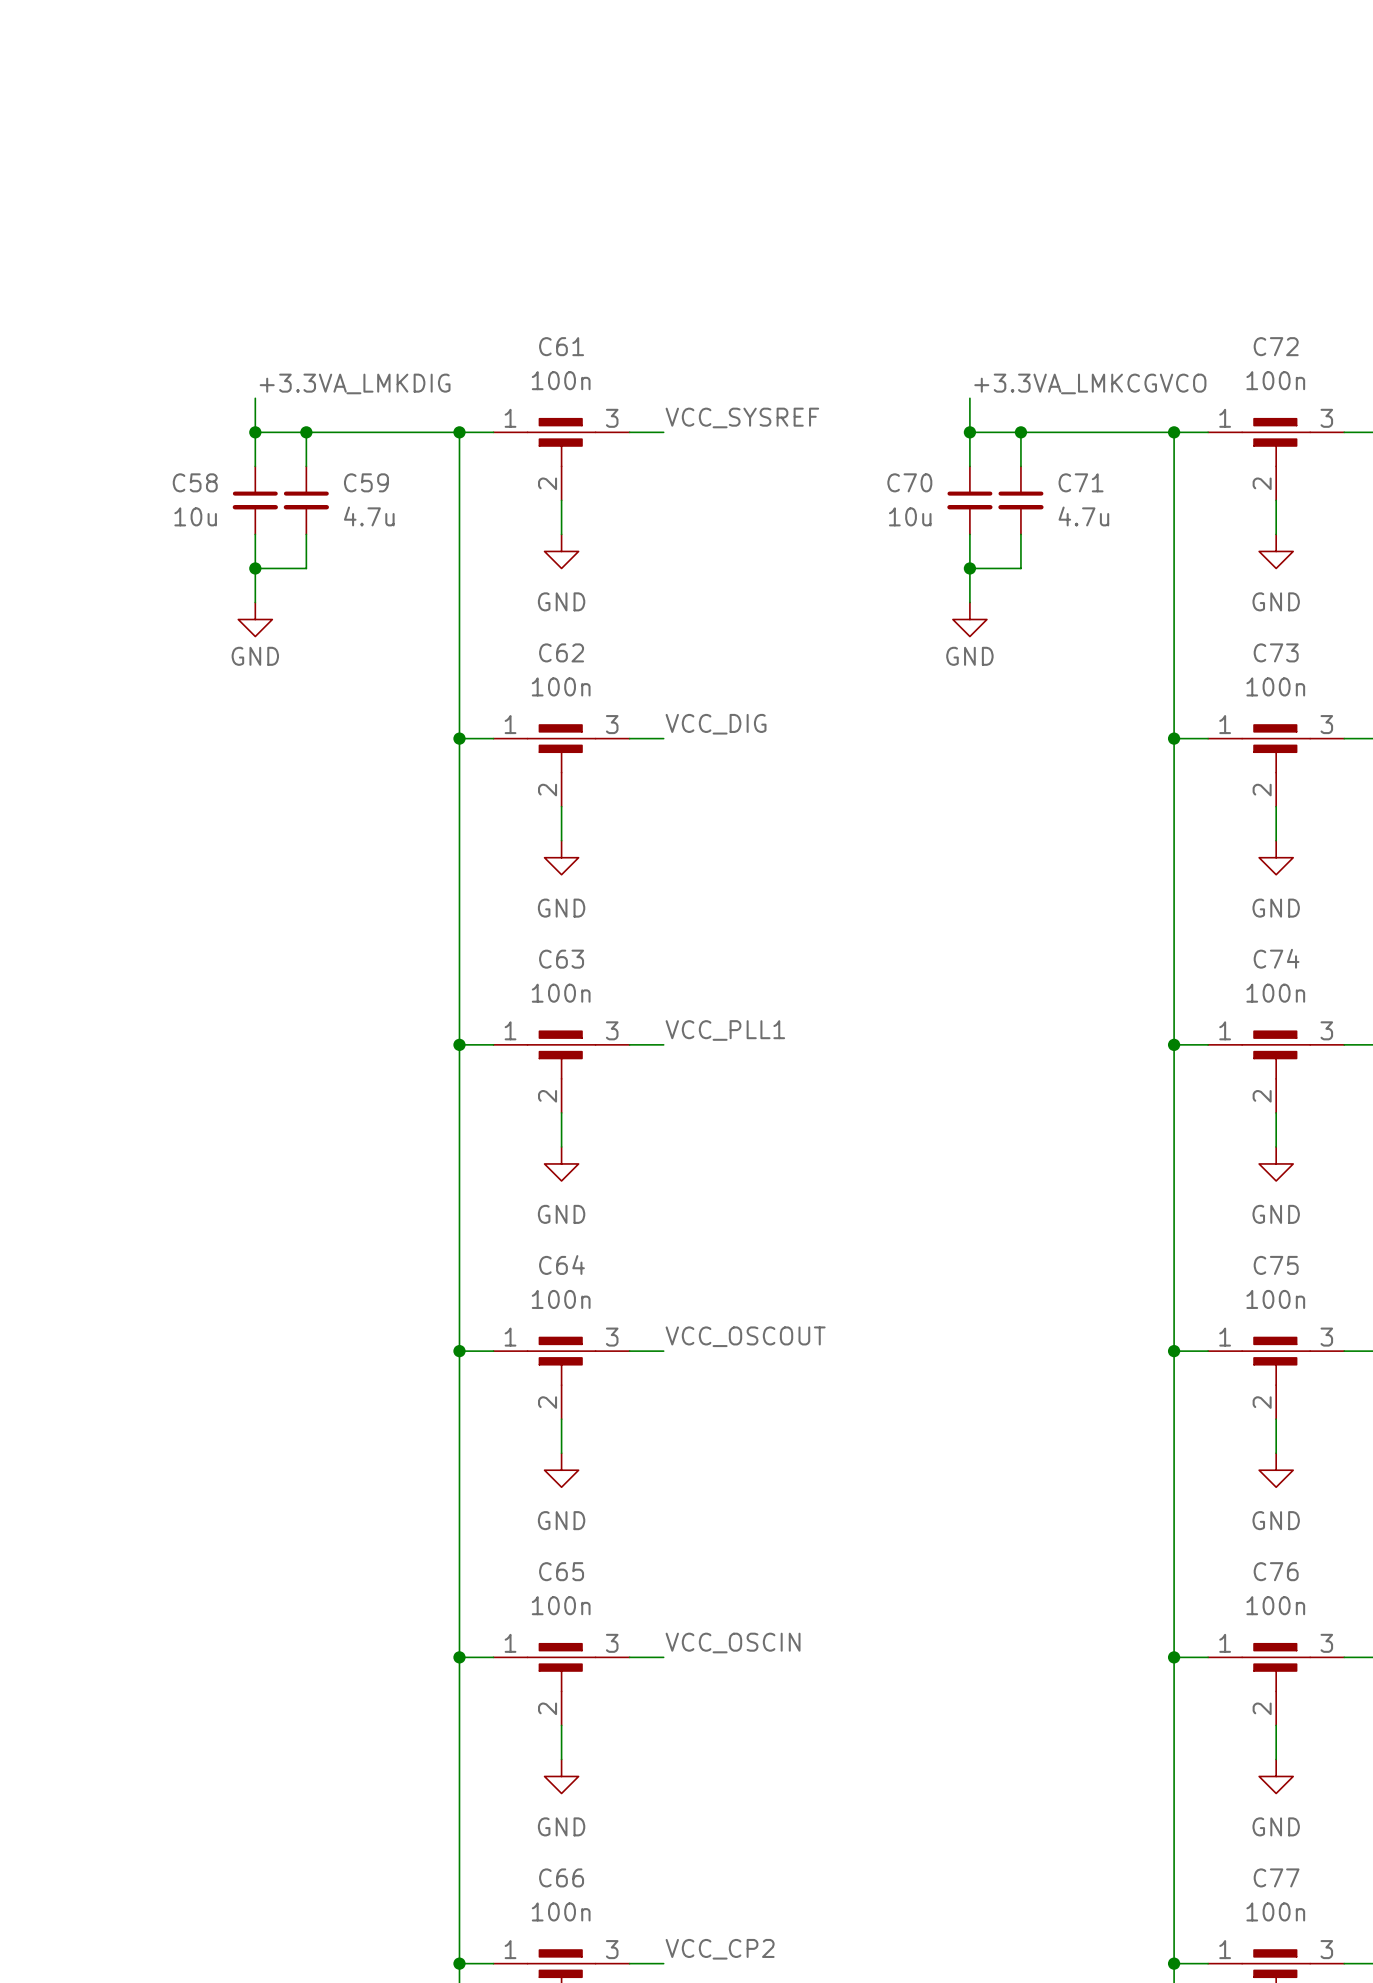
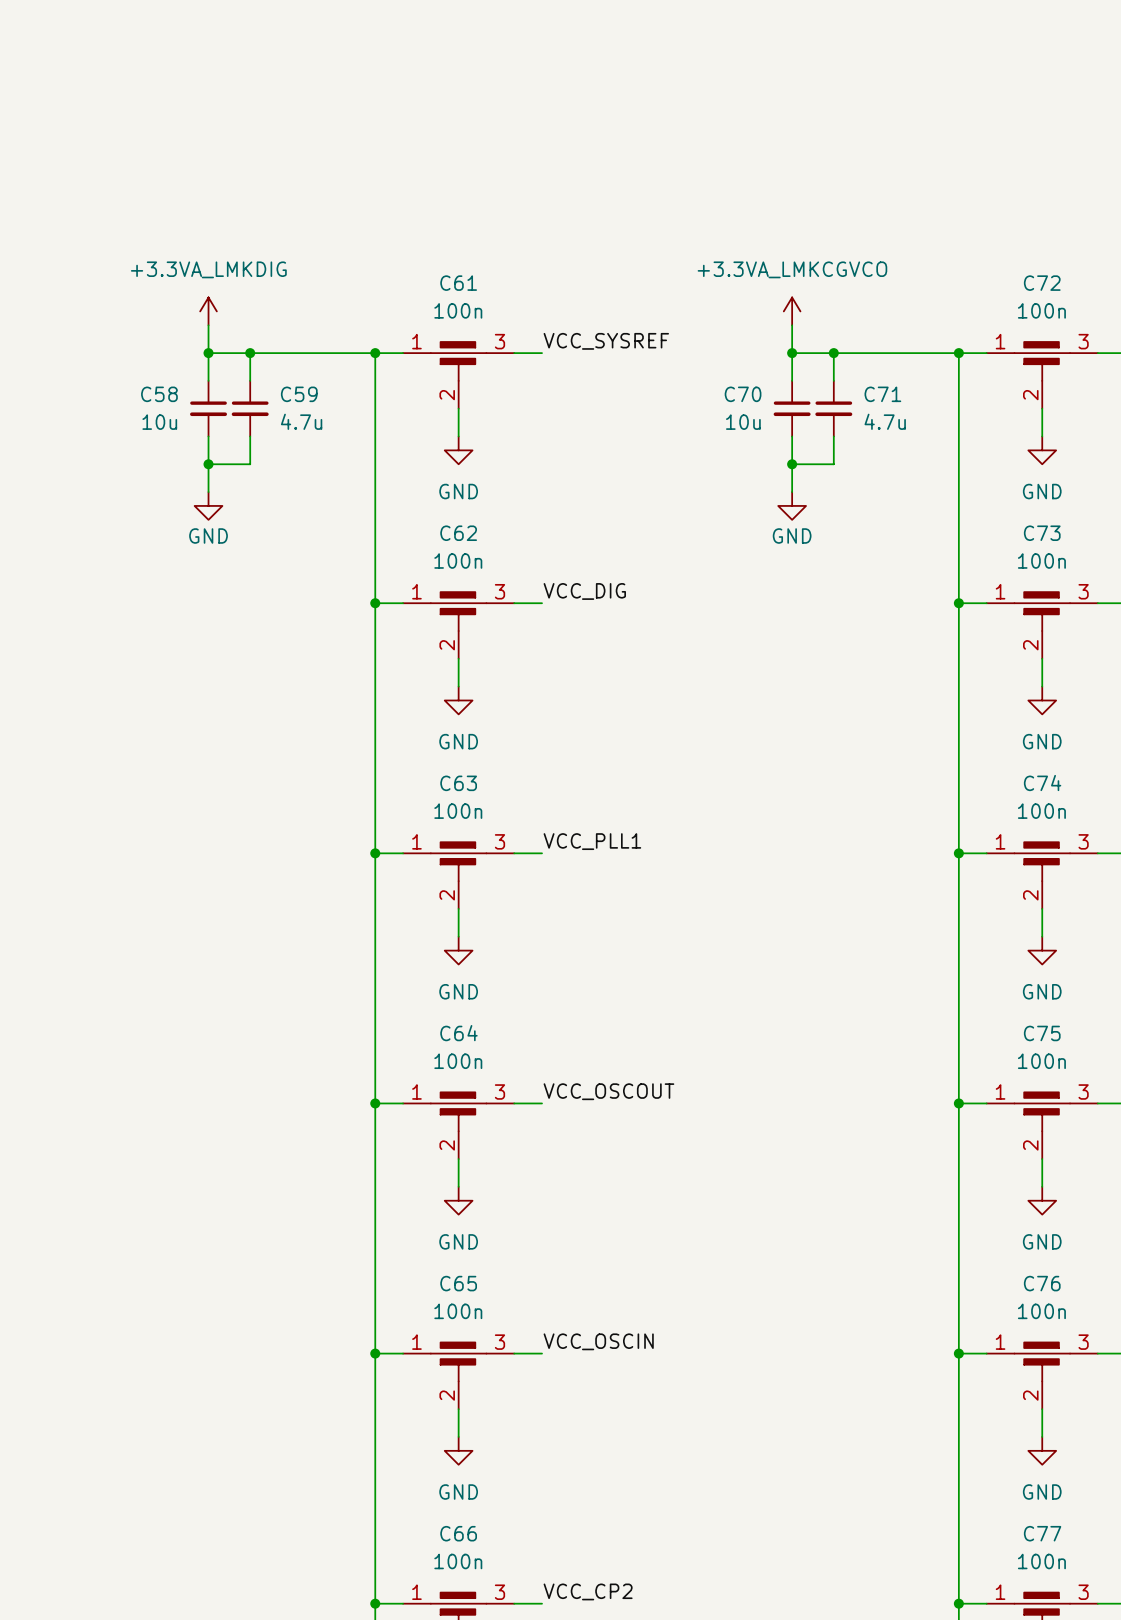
power symbol: none -> +3.3VA_LMKDIG (208, 311)
power symbol: none -> +3.3VA_LMKCGVCO (792, 311)
label: +3.3VA_LMKDIG (355, 383) -> none
label: +3.3VA_LMKCGVCO (1090, 383) -> none

